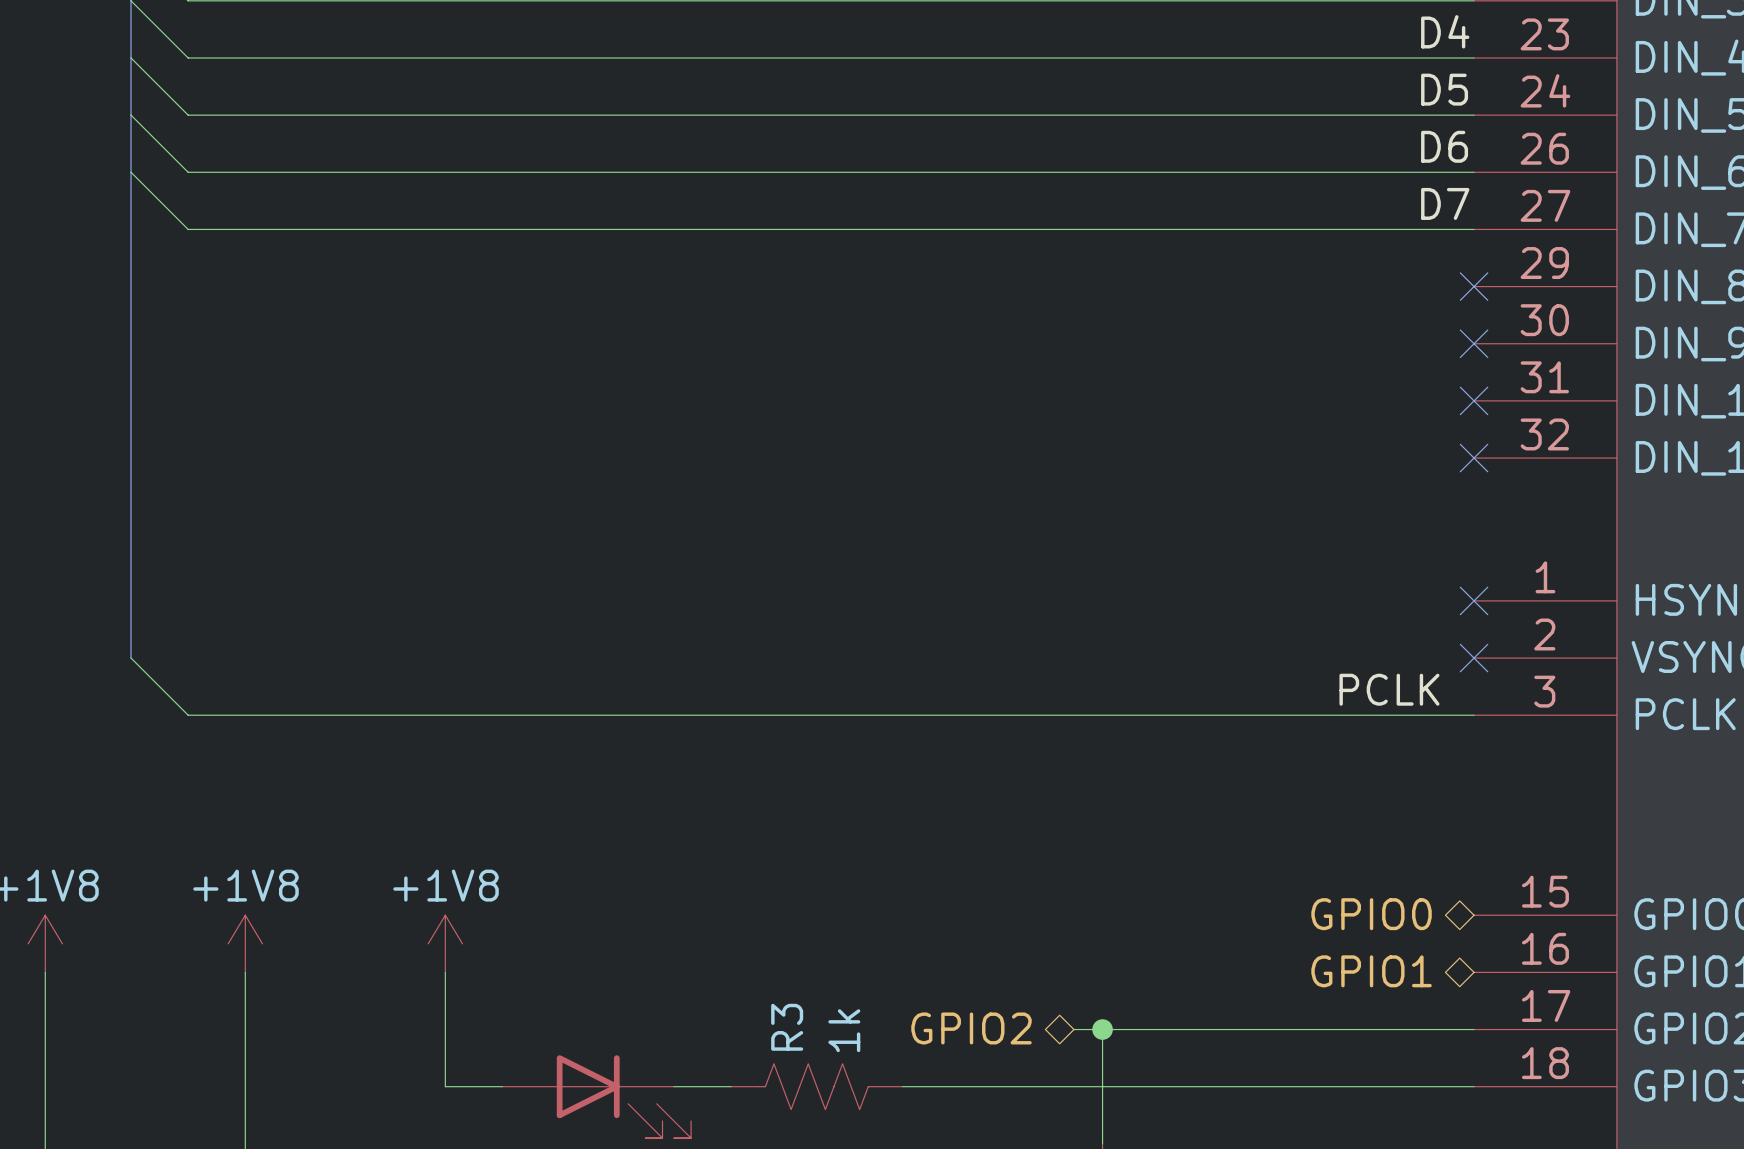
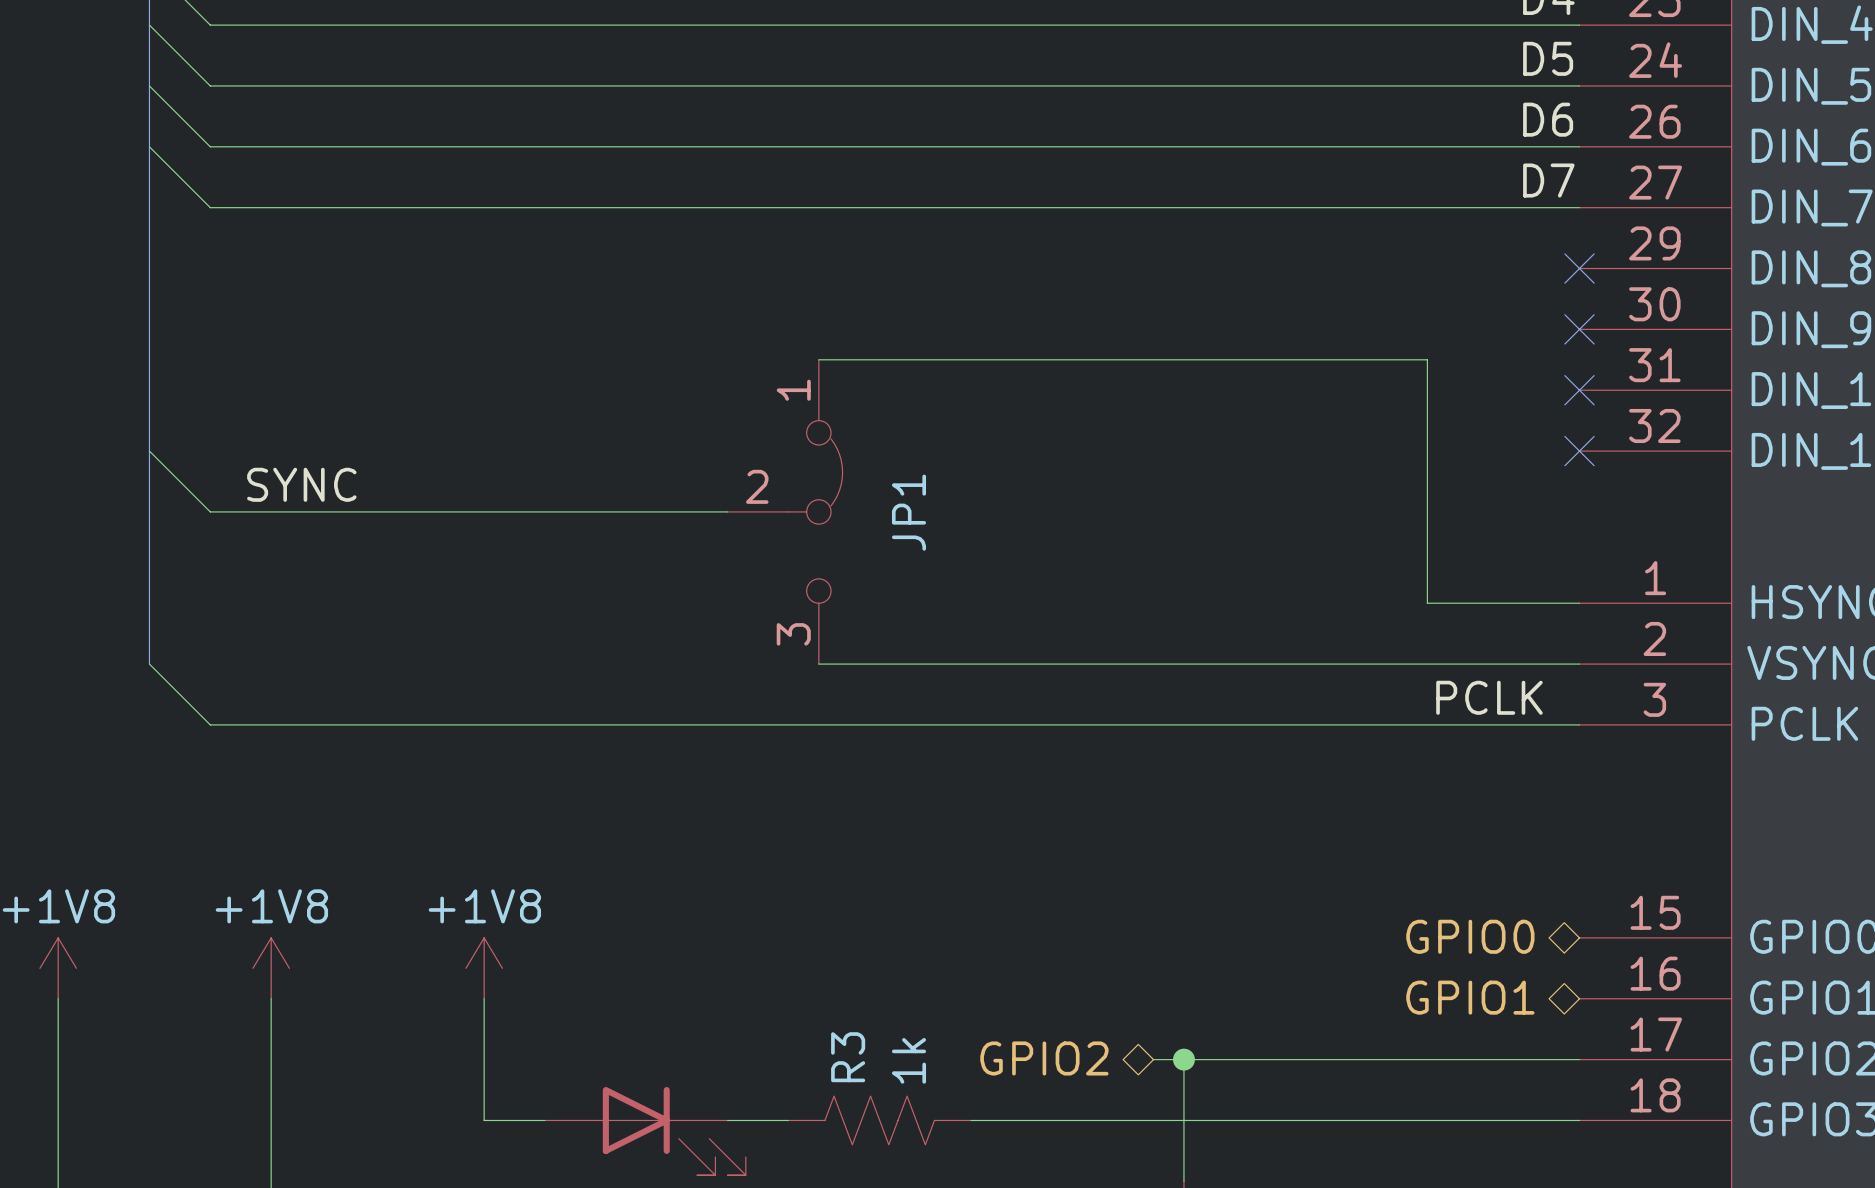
wire: none -> (818, 359) (1427, 359) (1427, 603) (1579, 603)
wire: none -> (149, 451) (210, 511) (727, 511)
label: none -> SYNC (301, 484)
JP1: none -> (785, 511)
no-connect mark: (1474, 600) -> none
wire: none -> (818, 664) (1579, 664)
no-connect mark: (1474, 658) -> none

